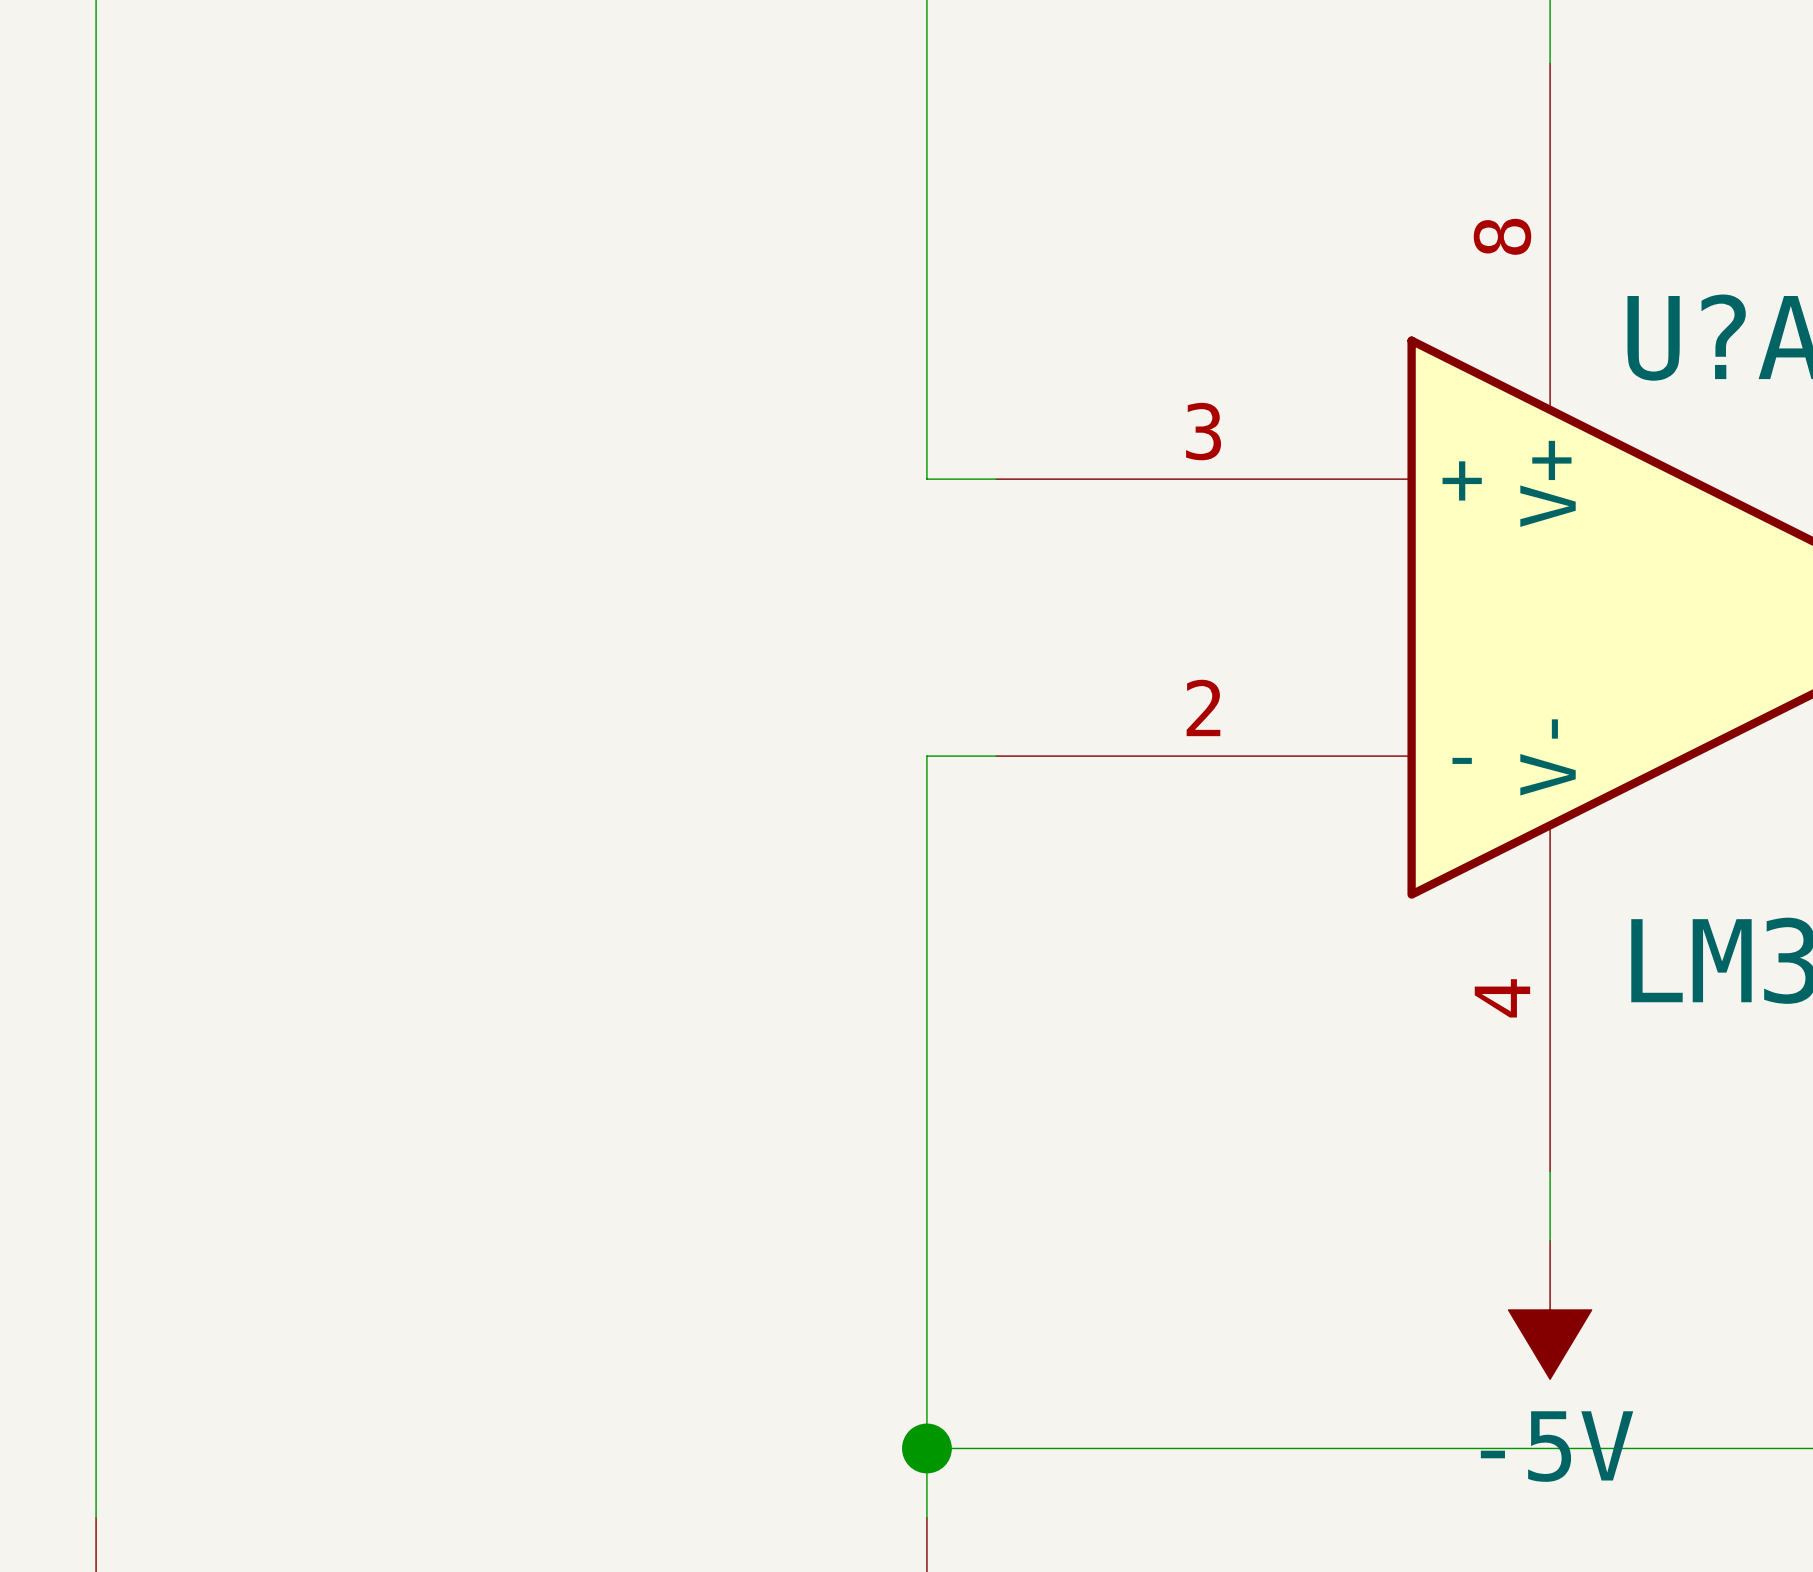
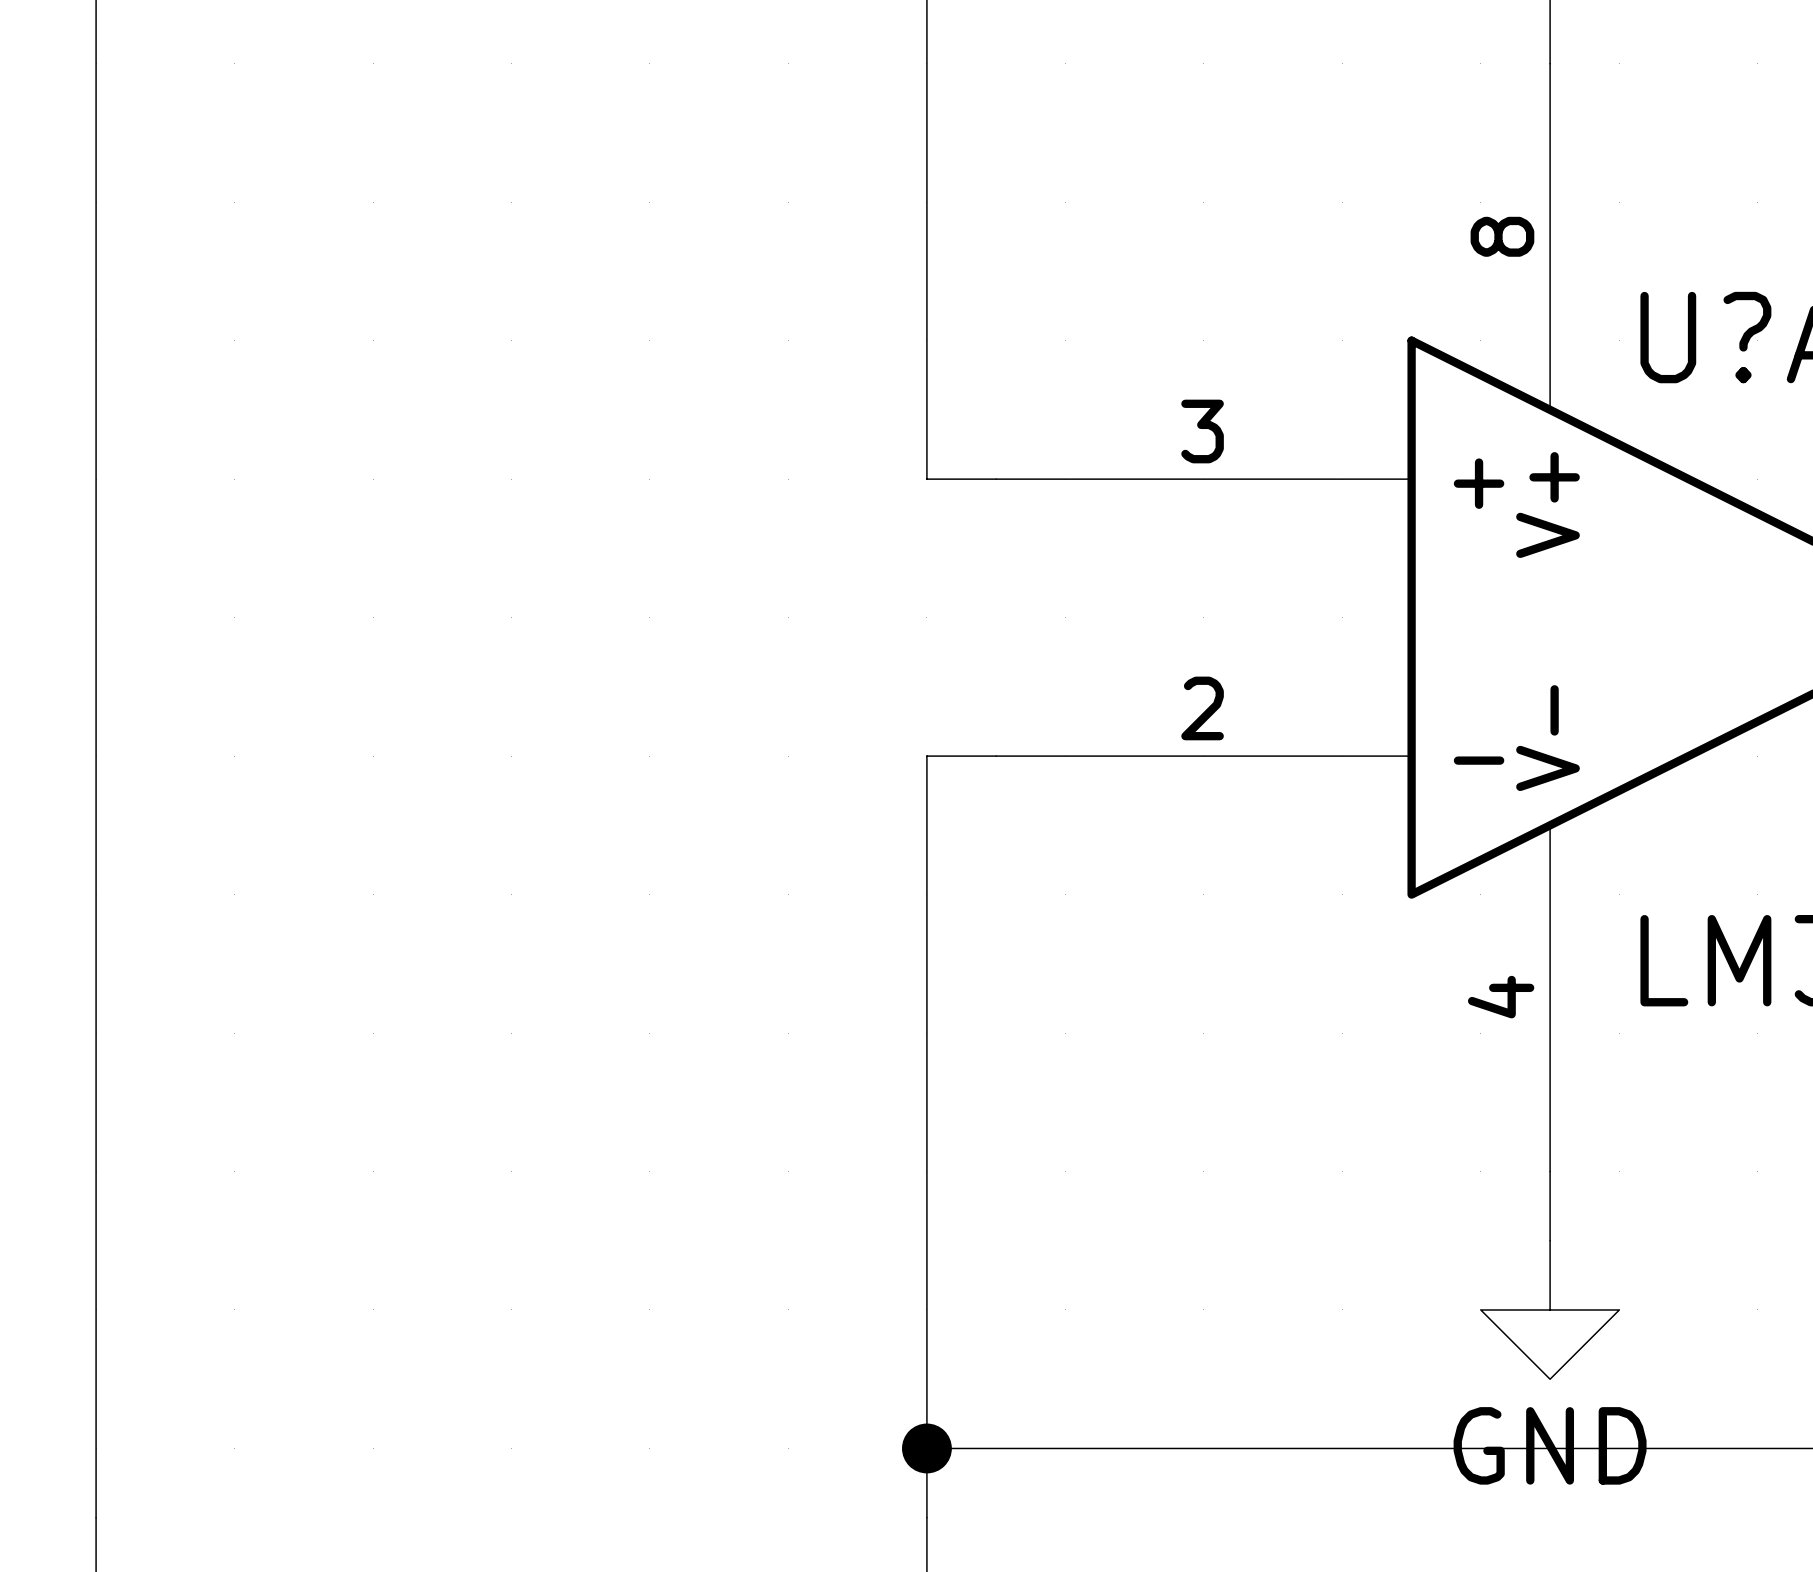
power symbol: -5V (1550, 1309) -> GND (1550, 1309)

